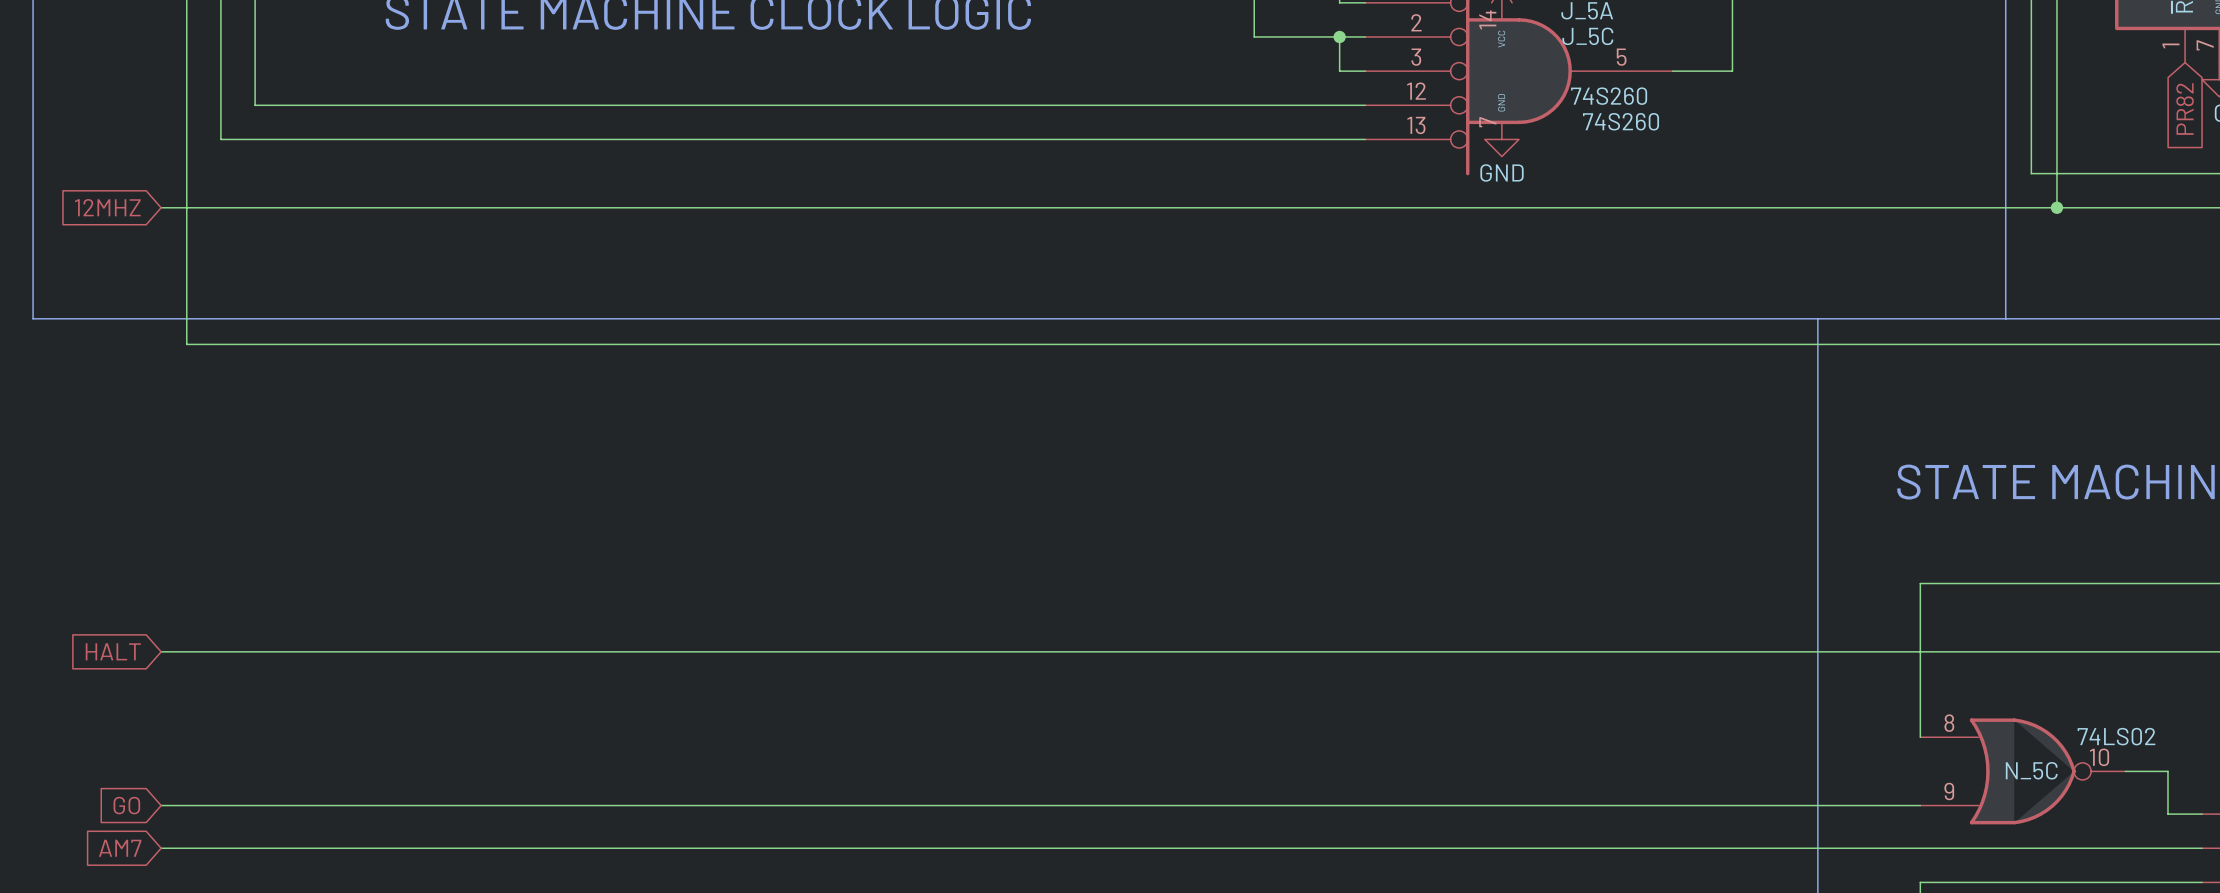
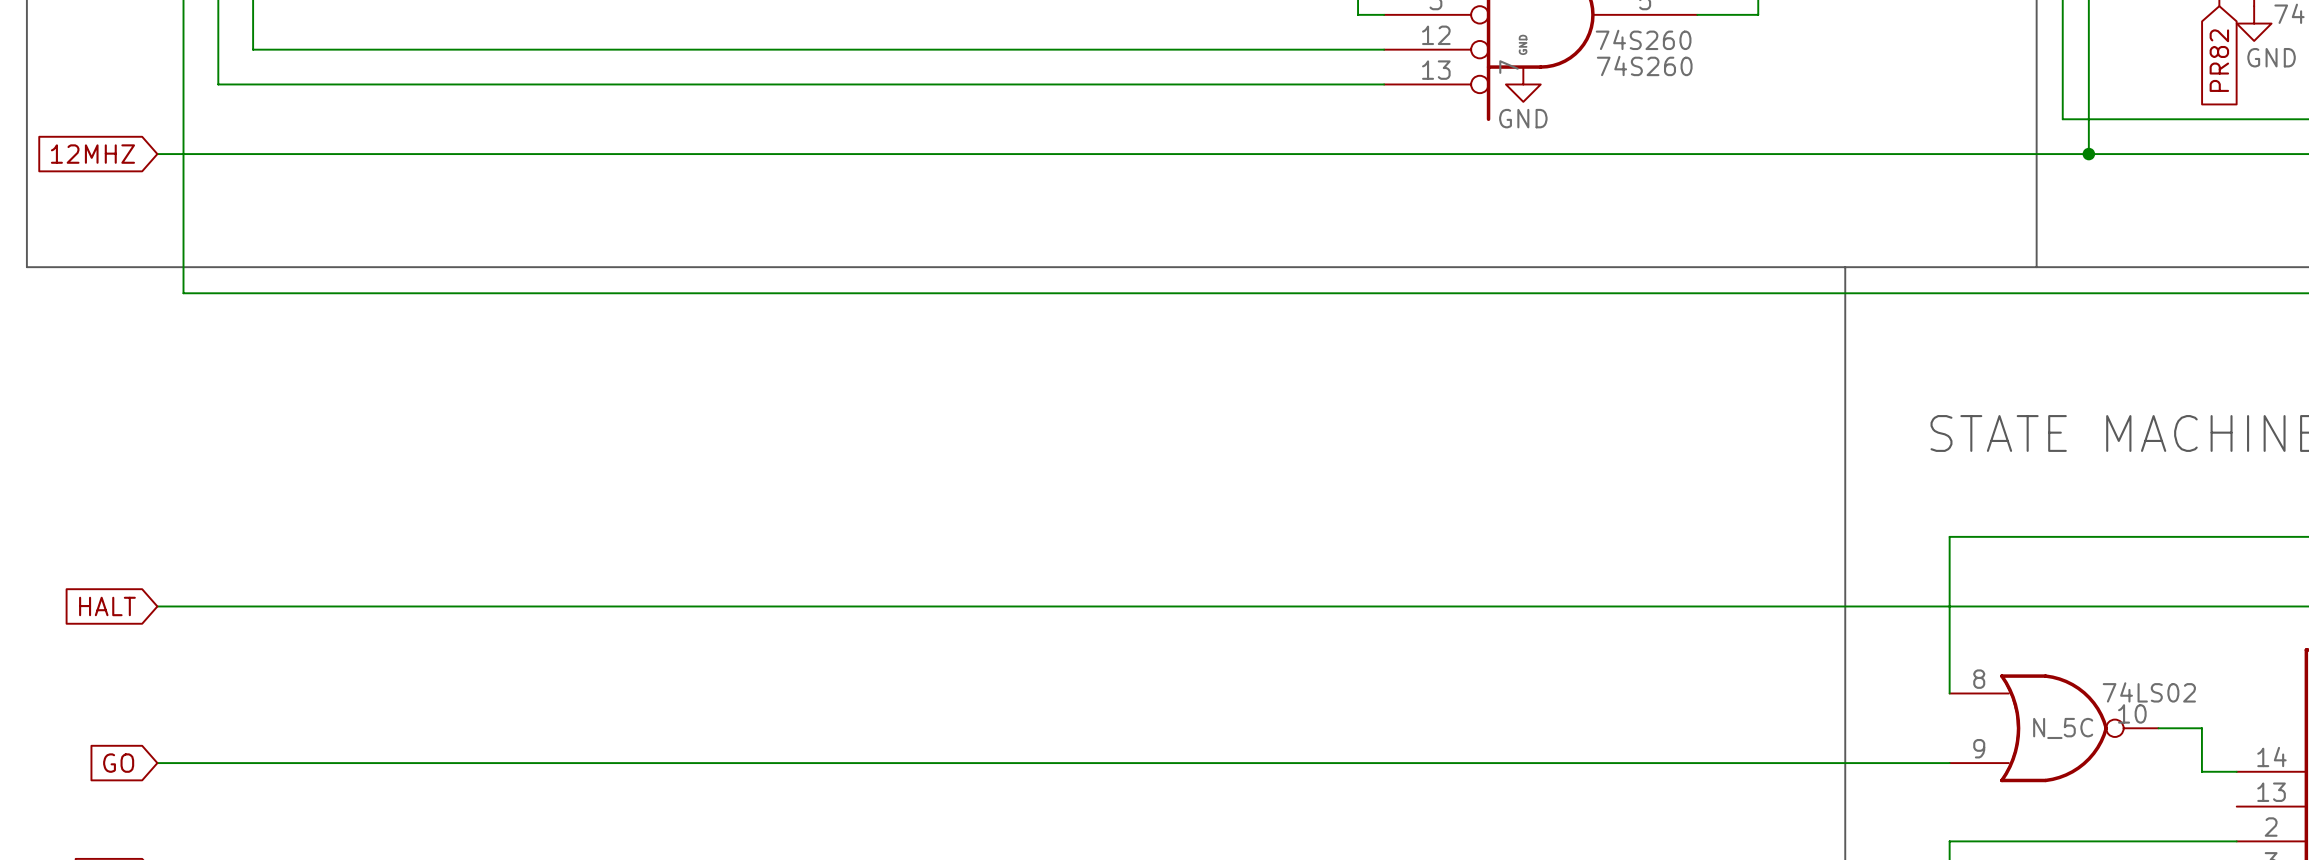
global label: AM7 (120, 848) -> none
wire: (161, 848) (2202, 848) -> none

